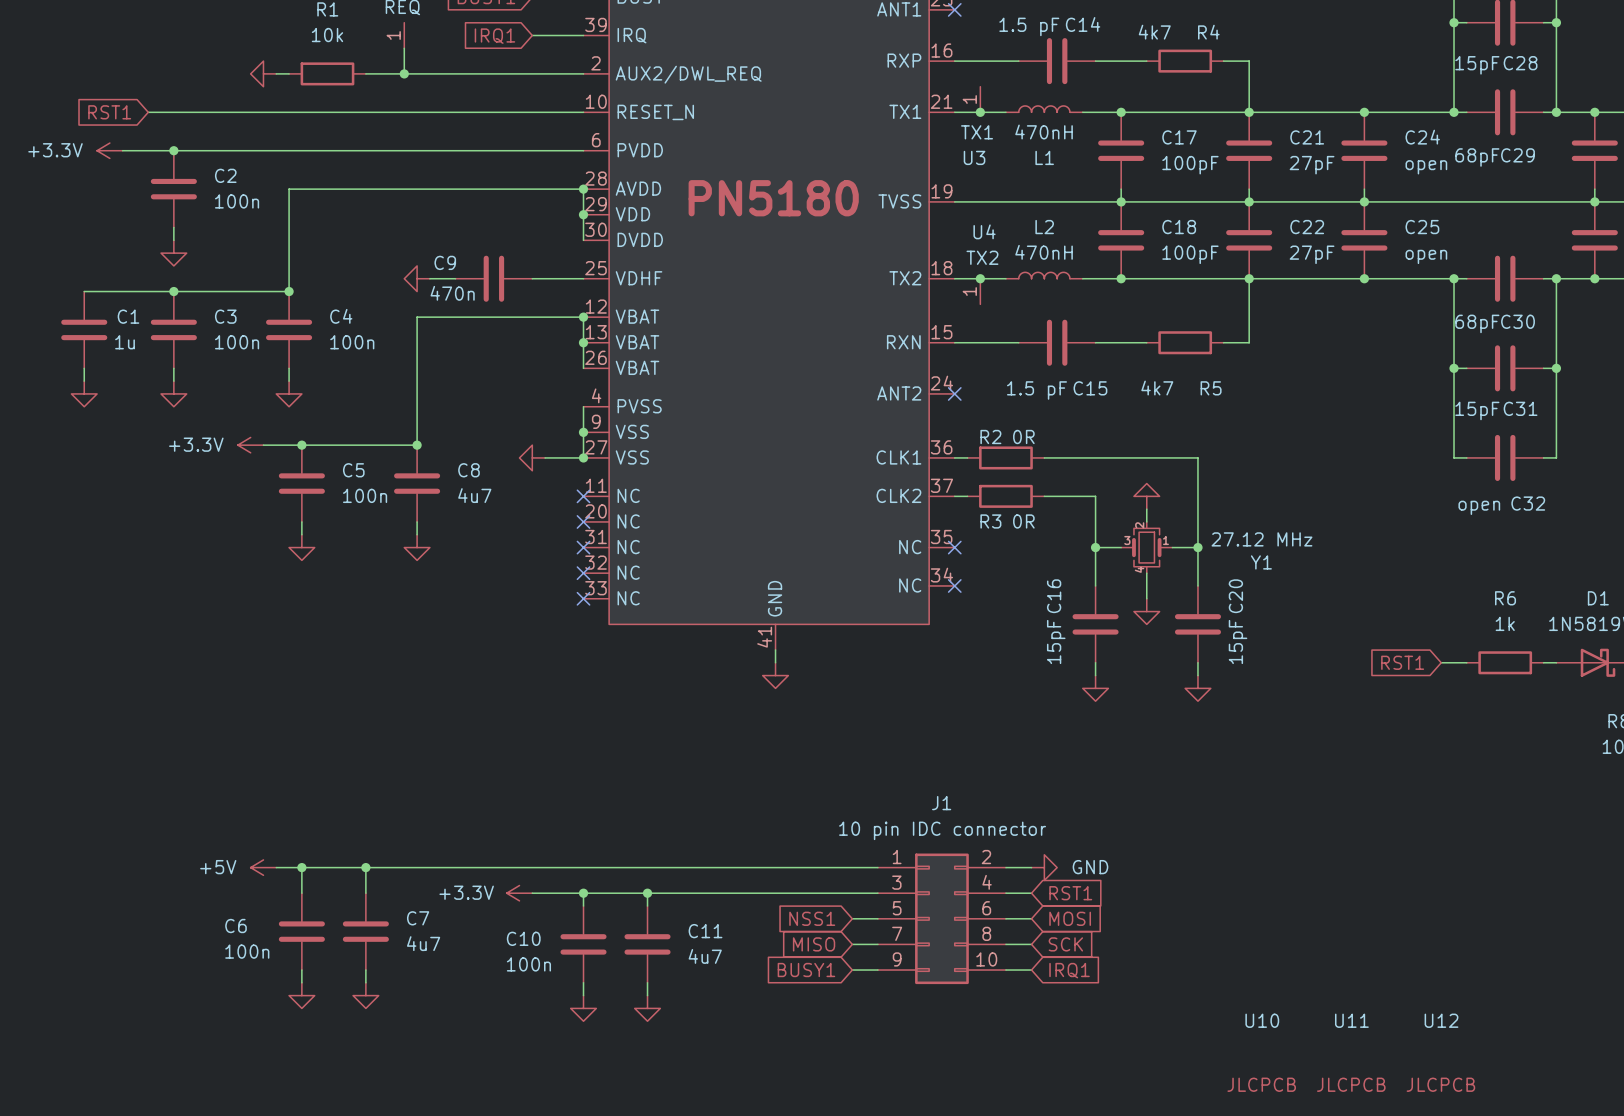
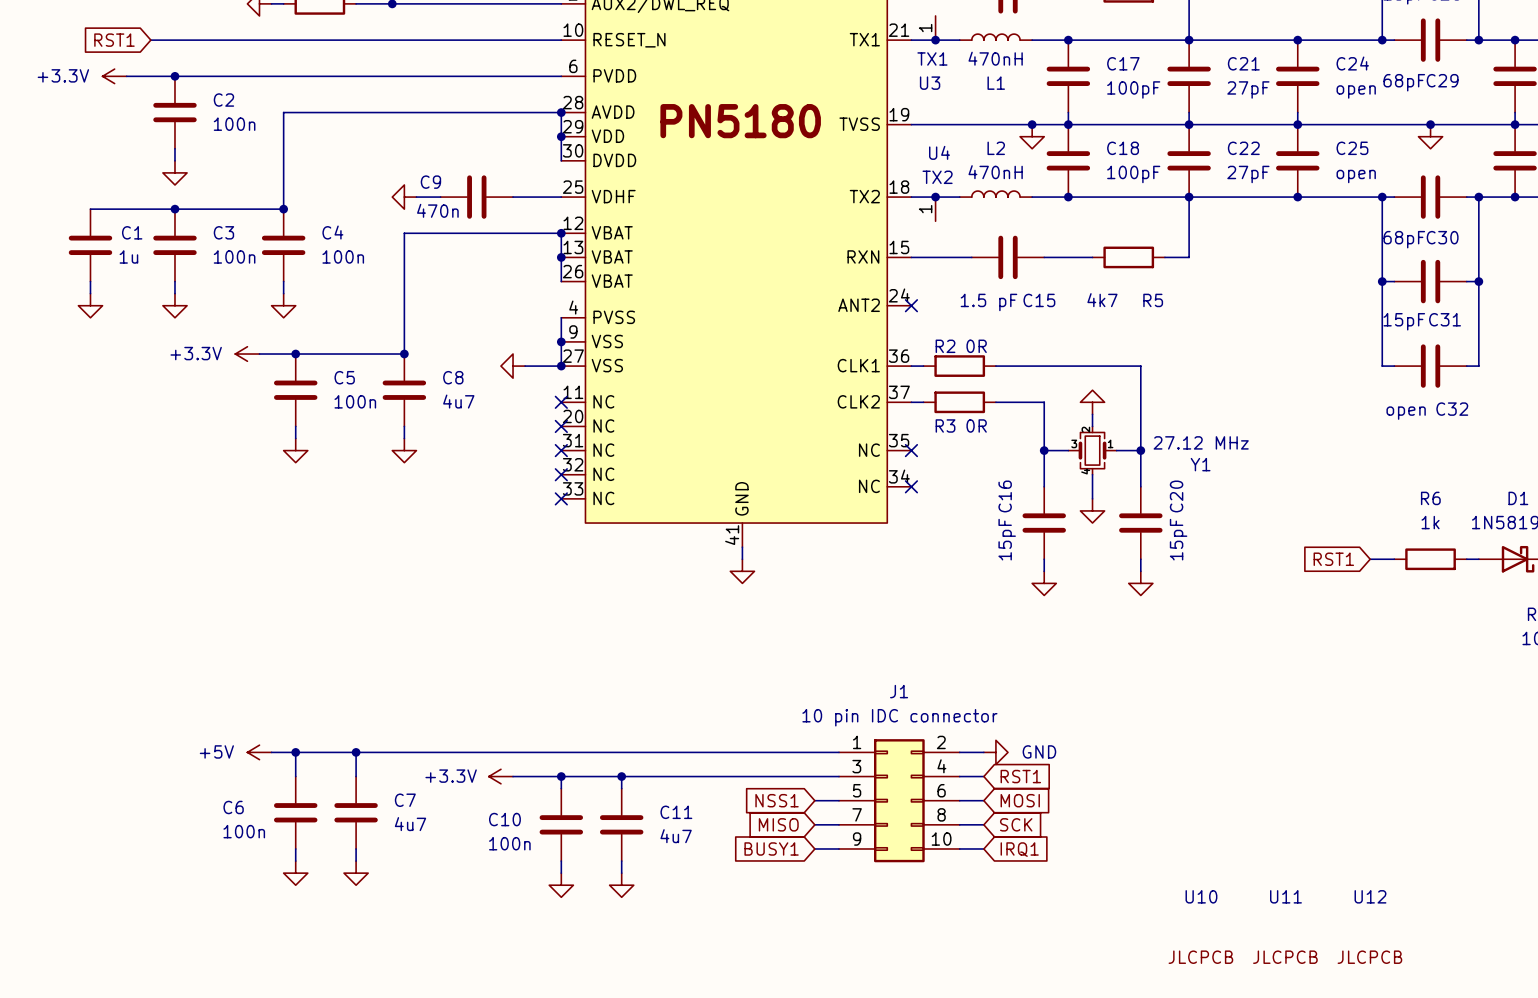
junction: none -> (1032, 124)
junction: none -> (1430, 124)
power symbol: none -> (1032, 136)
power symbol: none -> (1430, 136)

